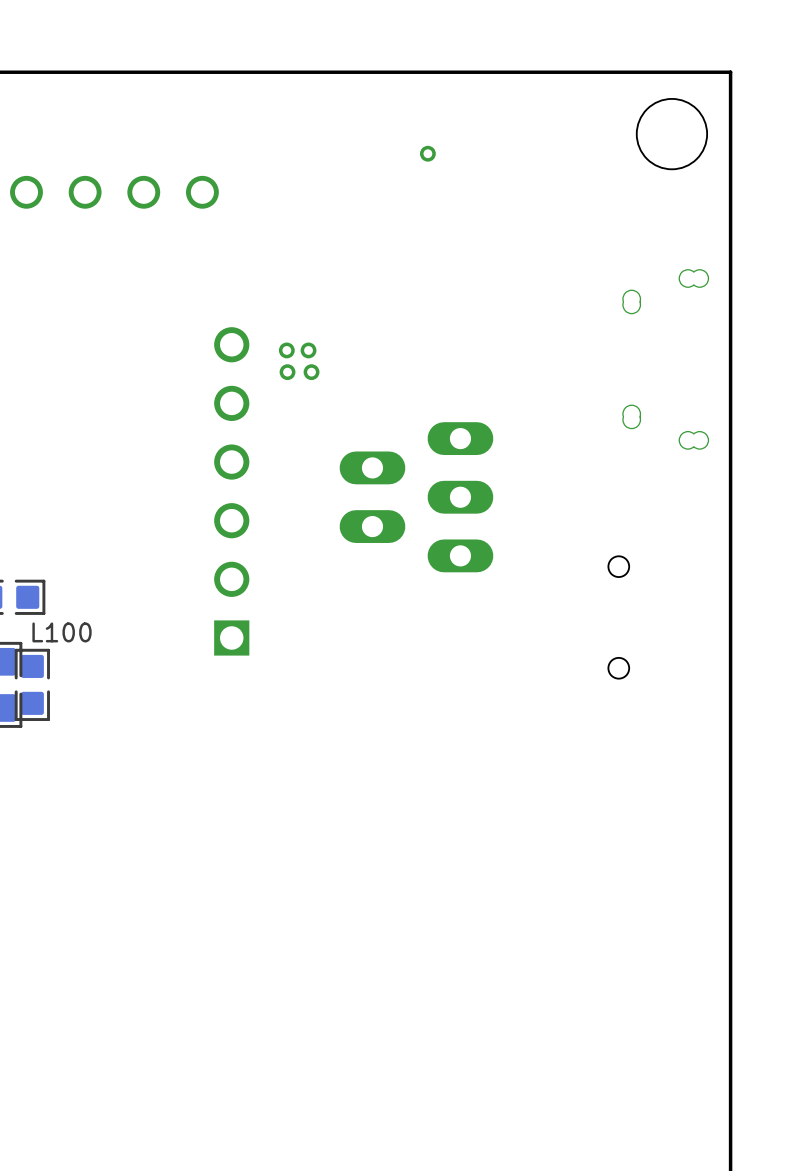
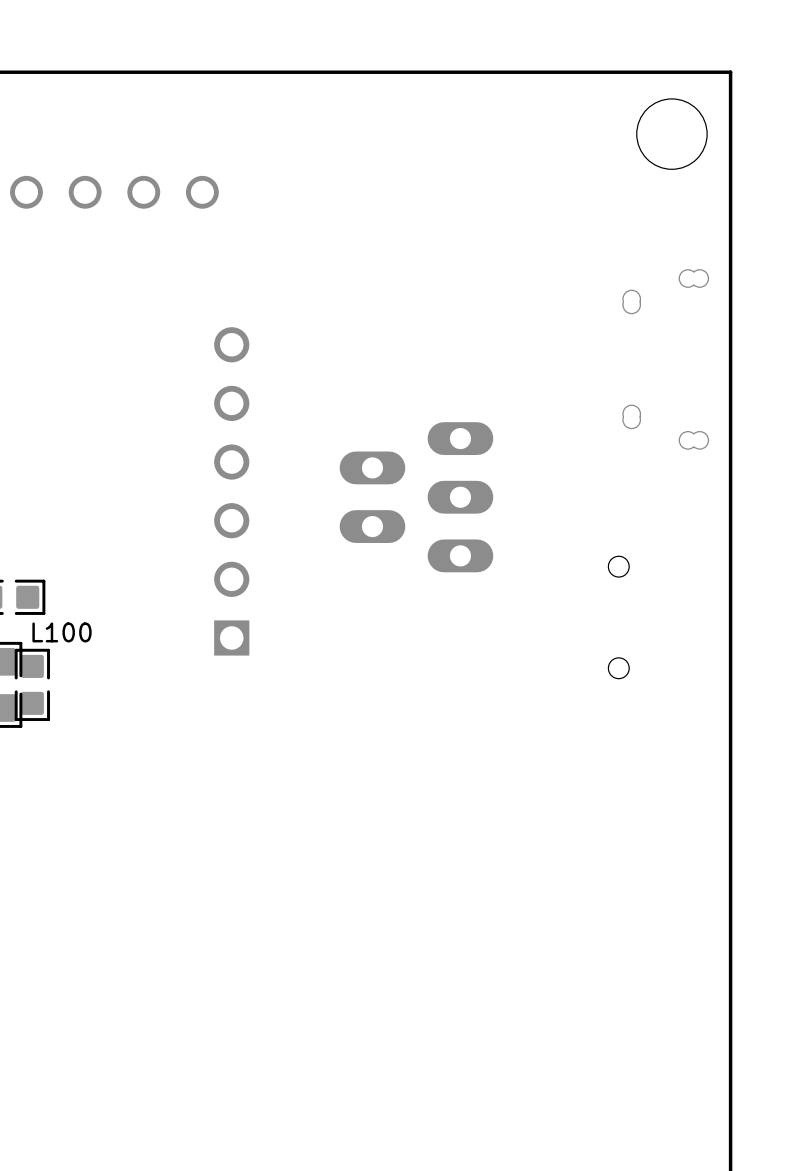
via: (427, 153) -> none
via: (286, 350) -> none
via: (308, 350) -> none
via: (287, 372) -> none
via: (311, 372) -> none

